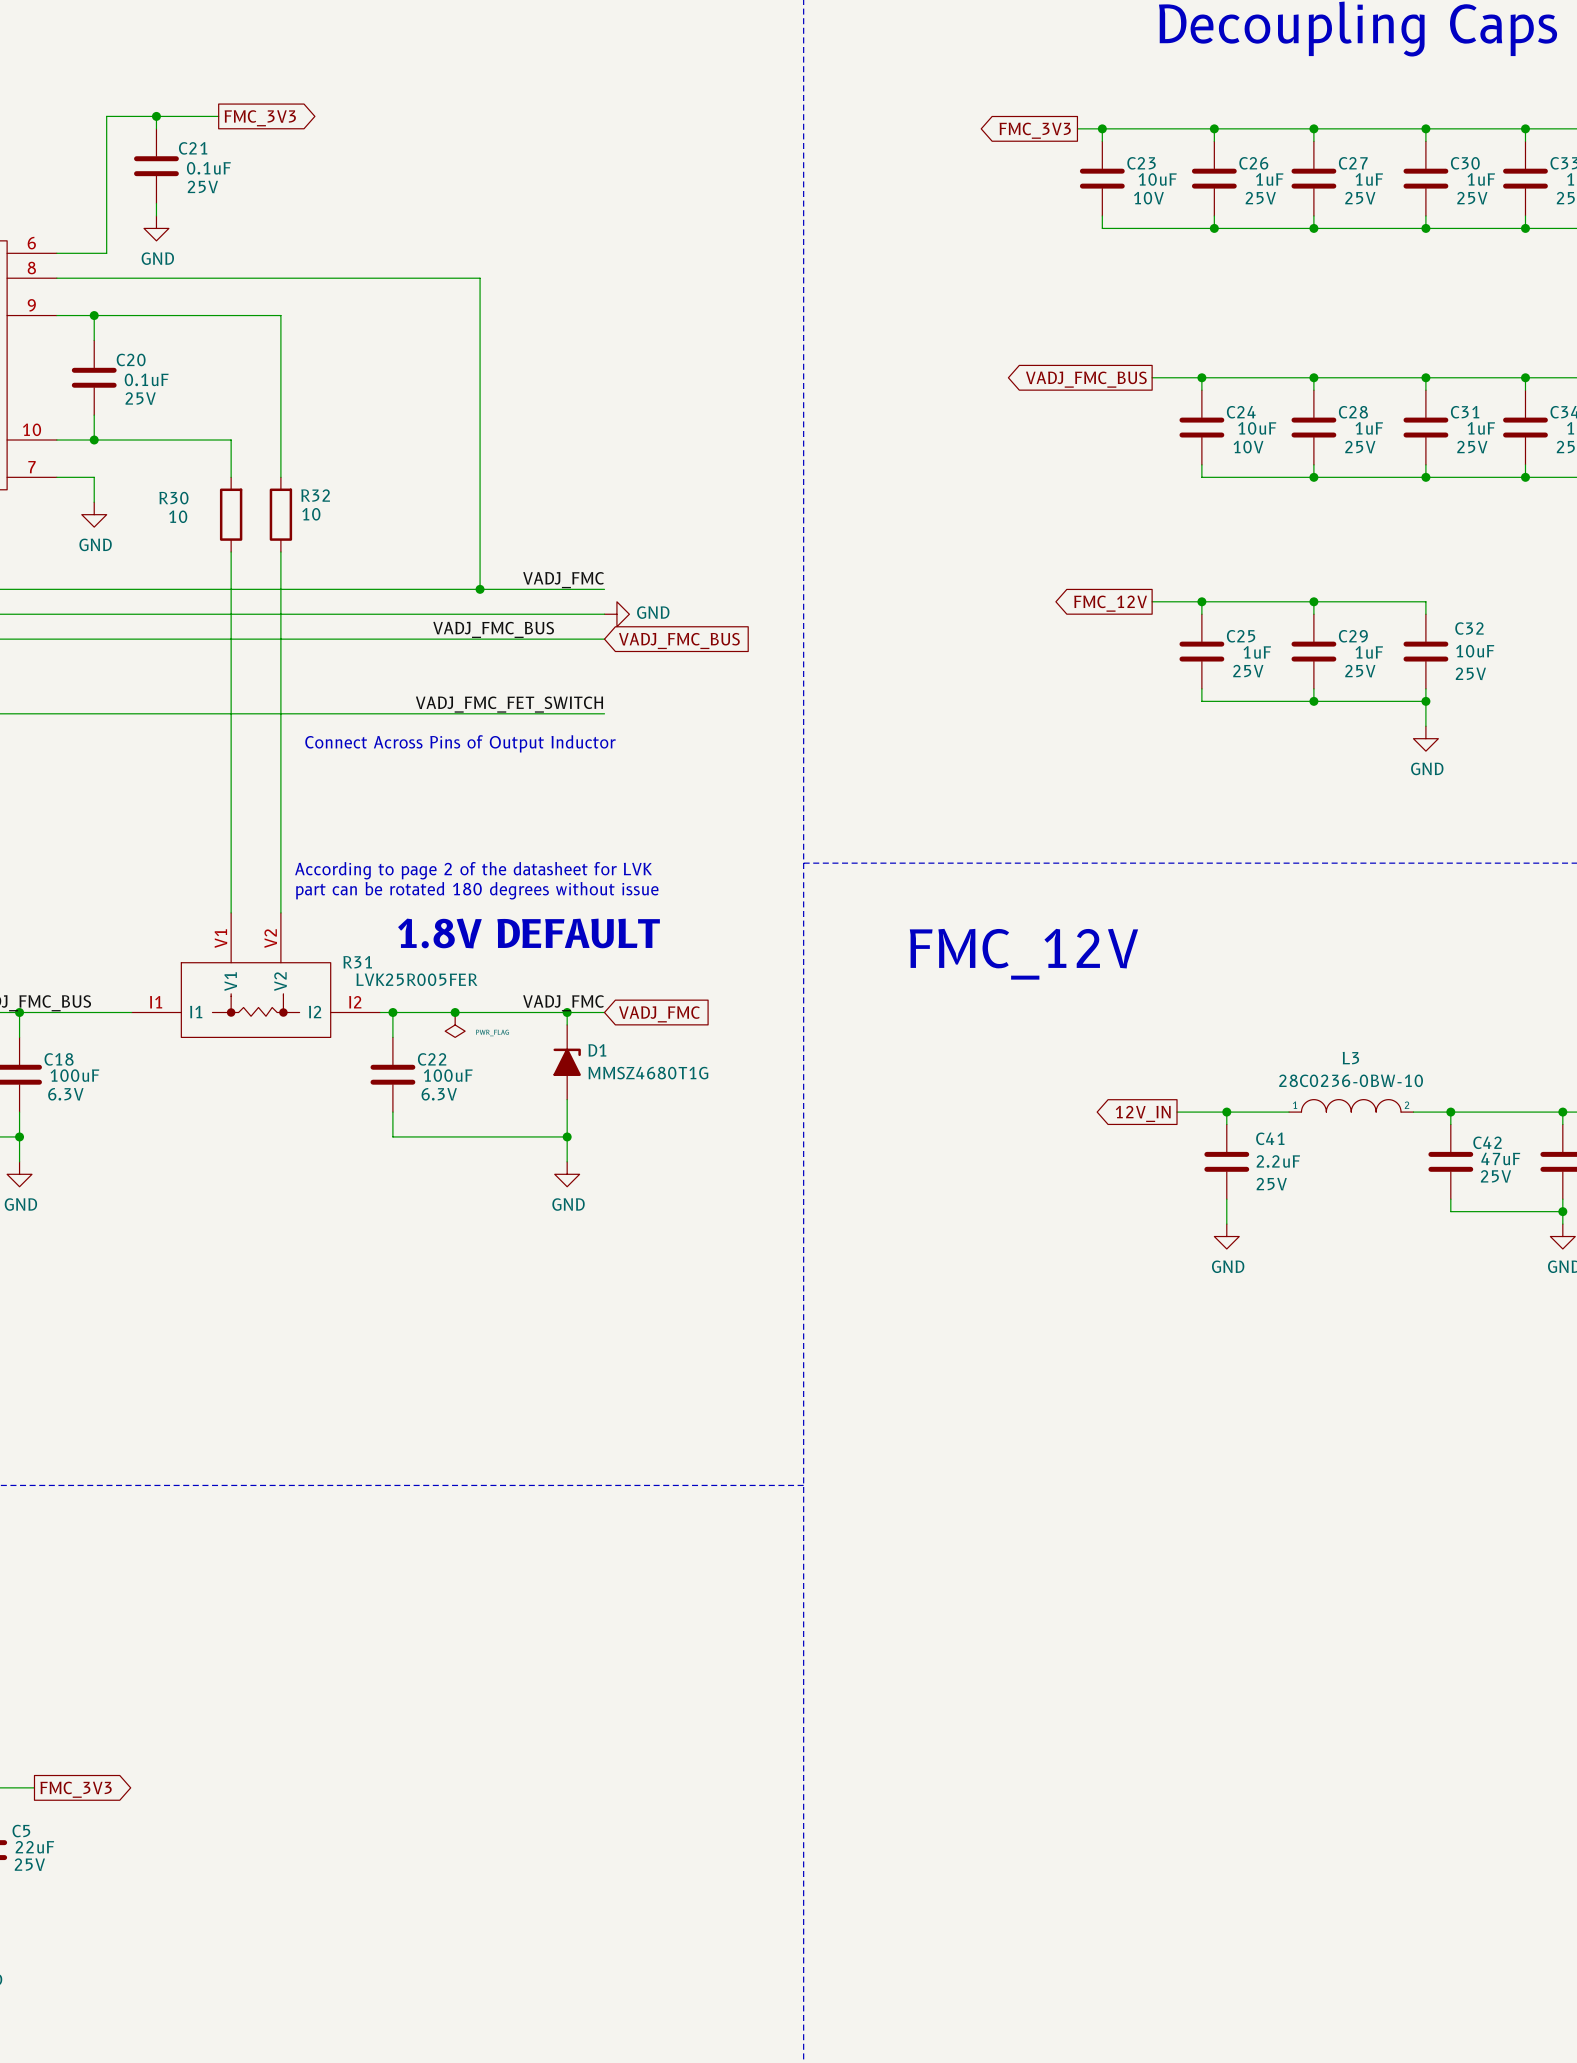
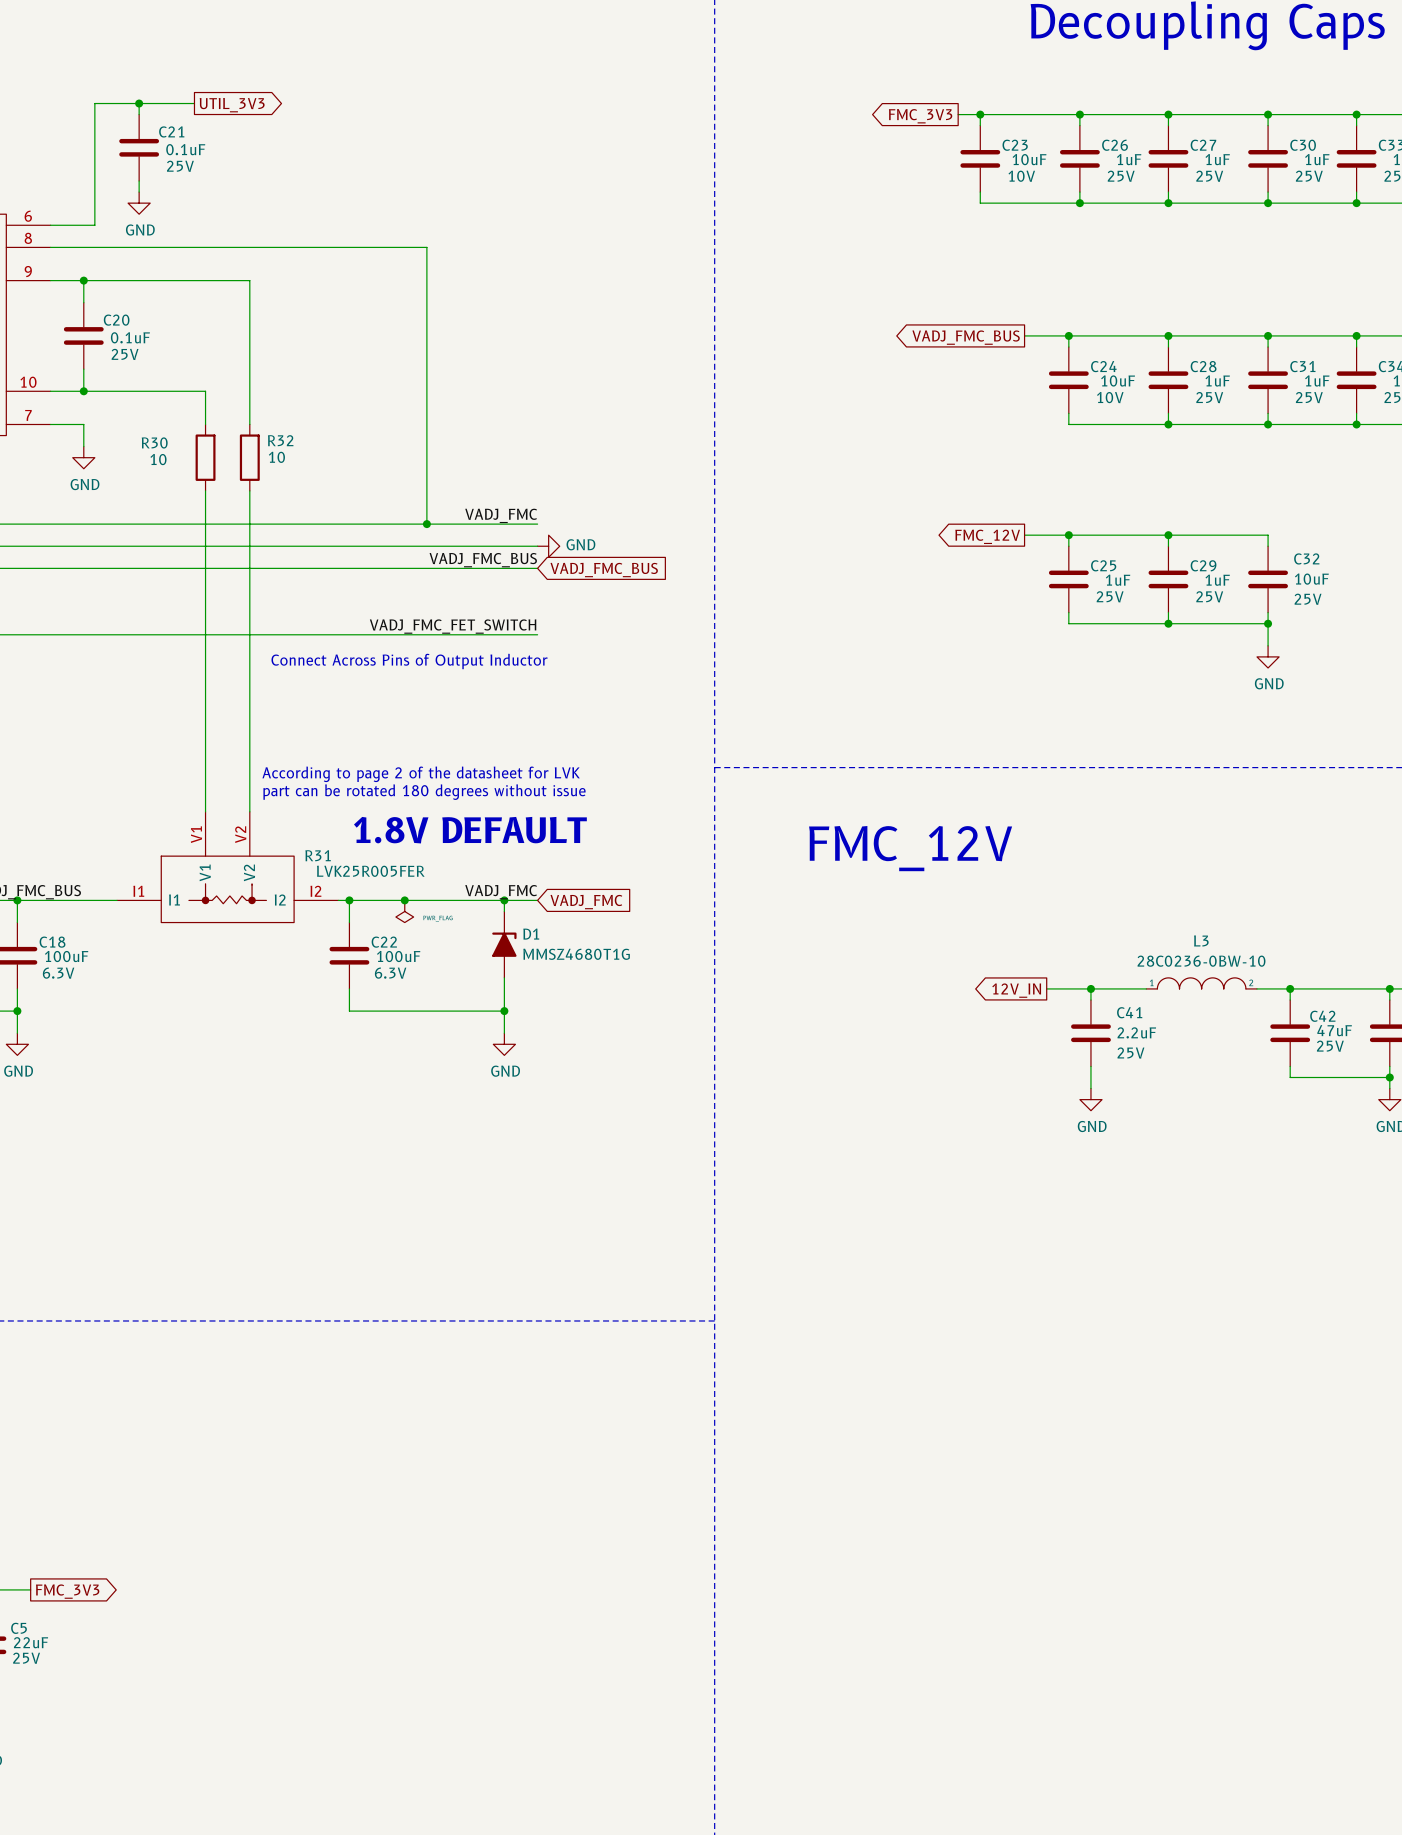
global label: FMC_3V3 (260, 118) -> UTIL_3V3 (232, 105)
label position: VADJ_FMC_BUS (493, 629) -> VADJ_FMC_BUS (483, 560)

